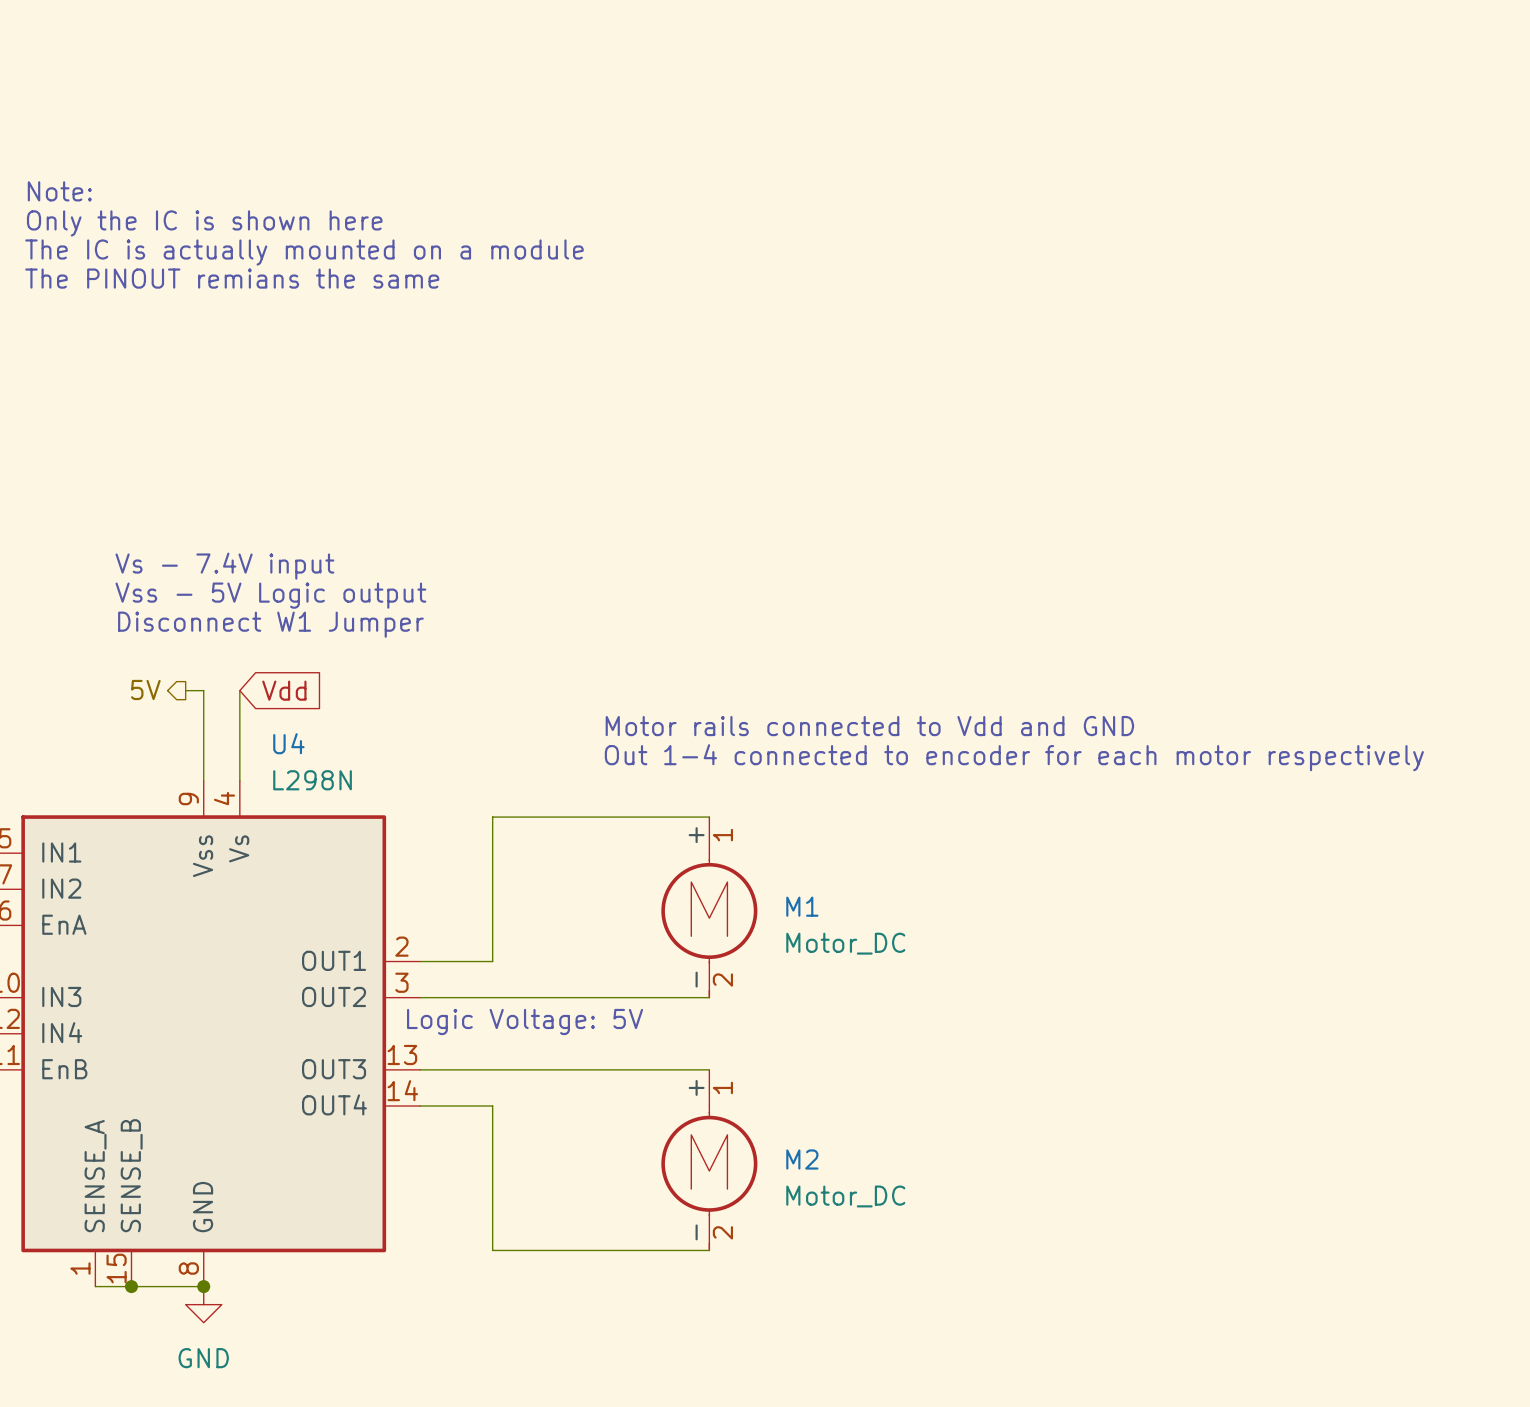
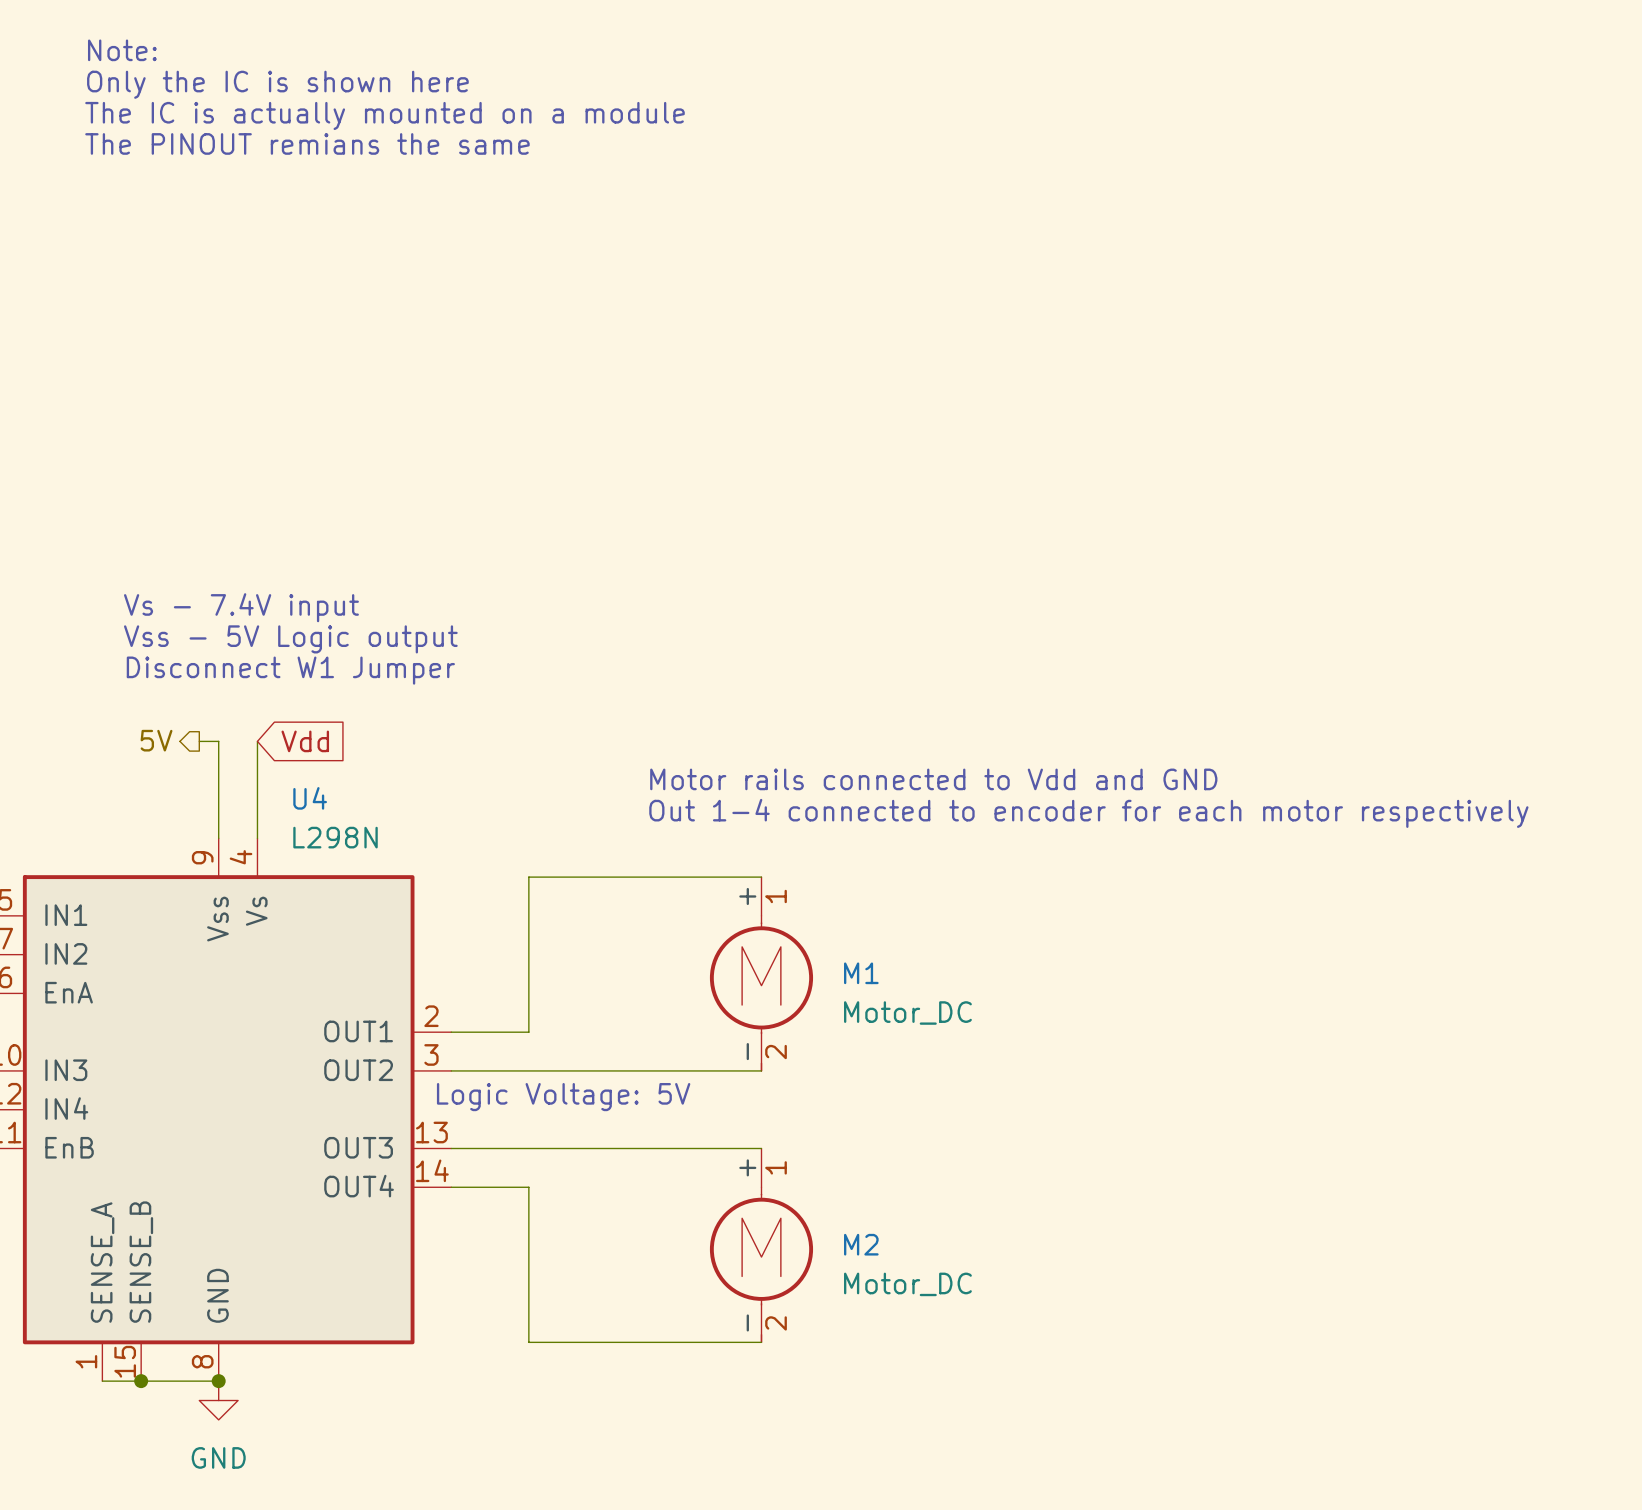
text position: Note: (59, 191) -> Note: (122, 50)
text position: Only the IC is shown here (204, 223) -> Only the IC is shown here (277, 84)
text position: The IC is actually mounted on a module (304, 252) -> The IC is actually mounted on a module (385, 115)
text position: The PINOUT remians the same (232, 278) -> The PINOUT remians the same (307, 143)

